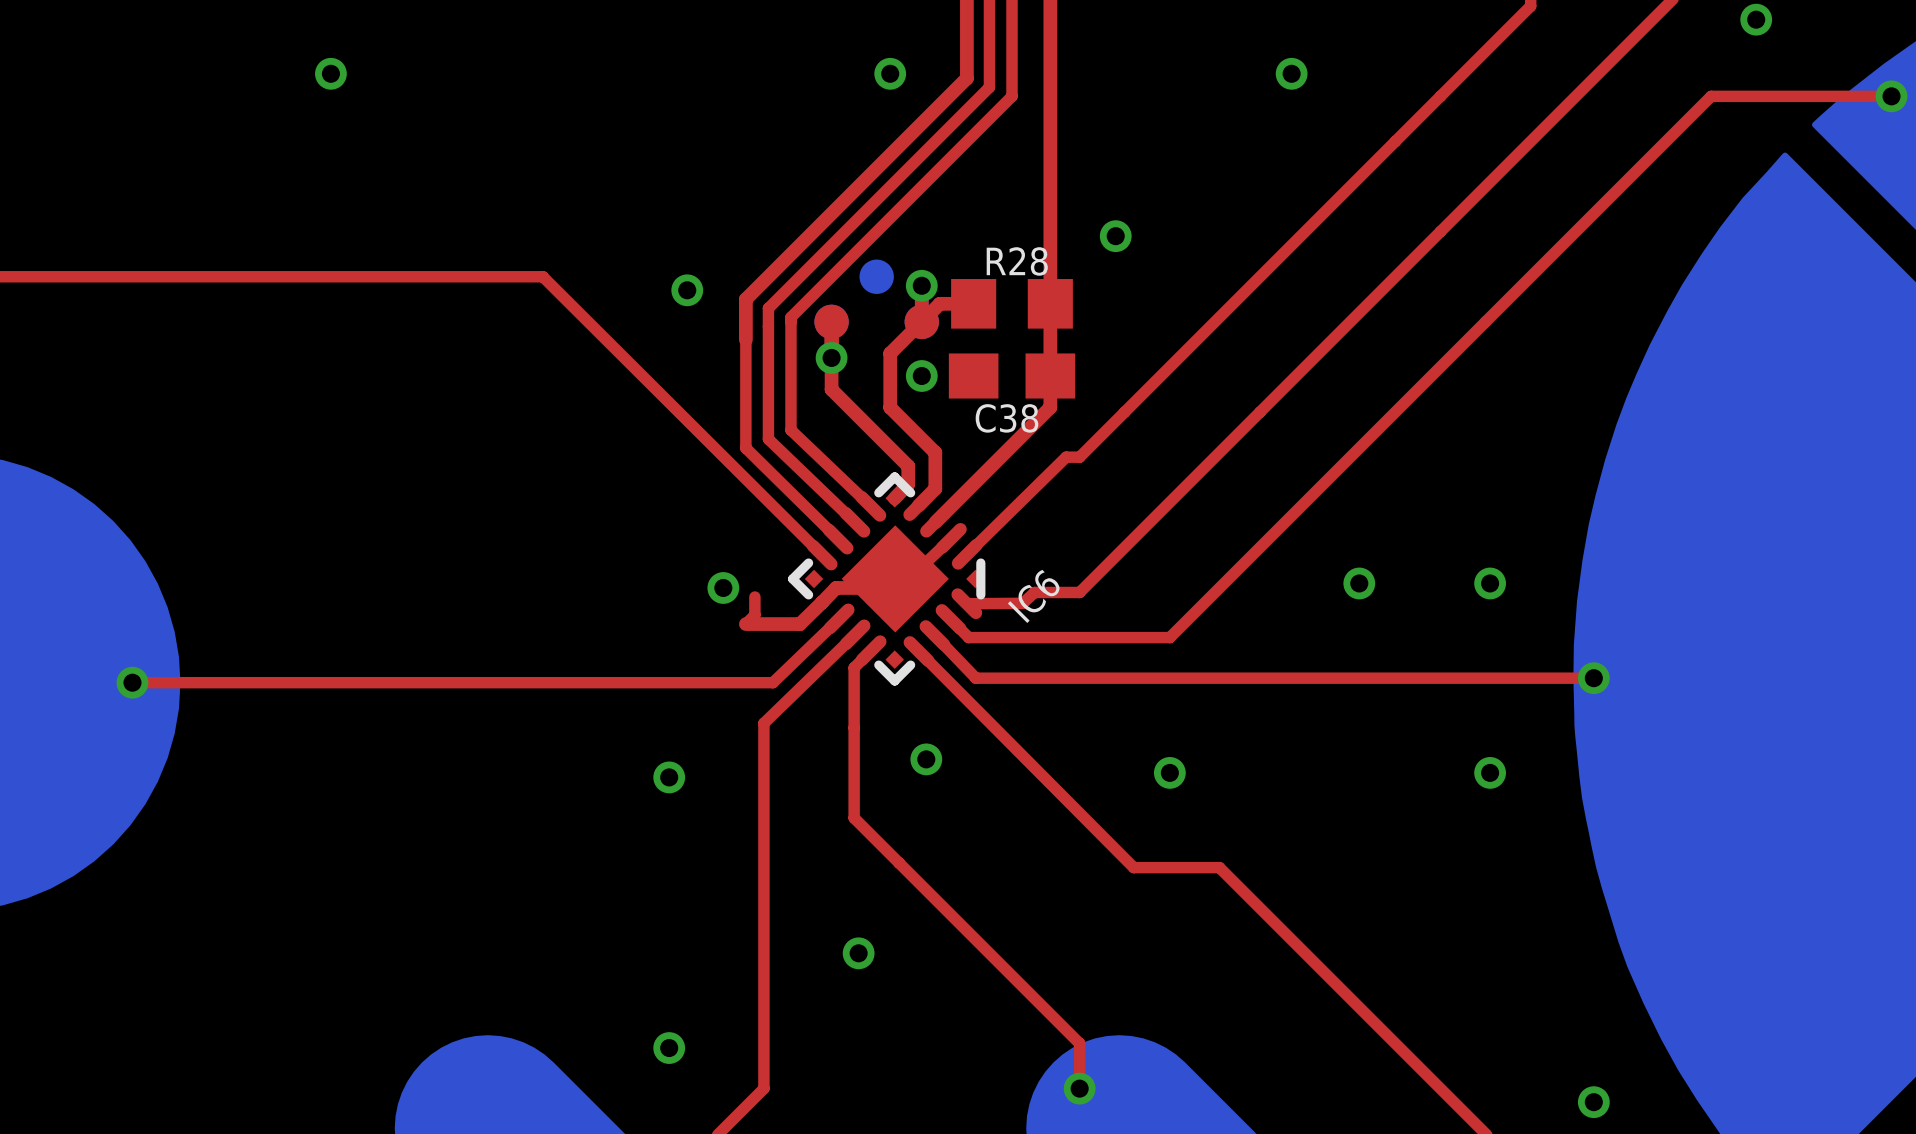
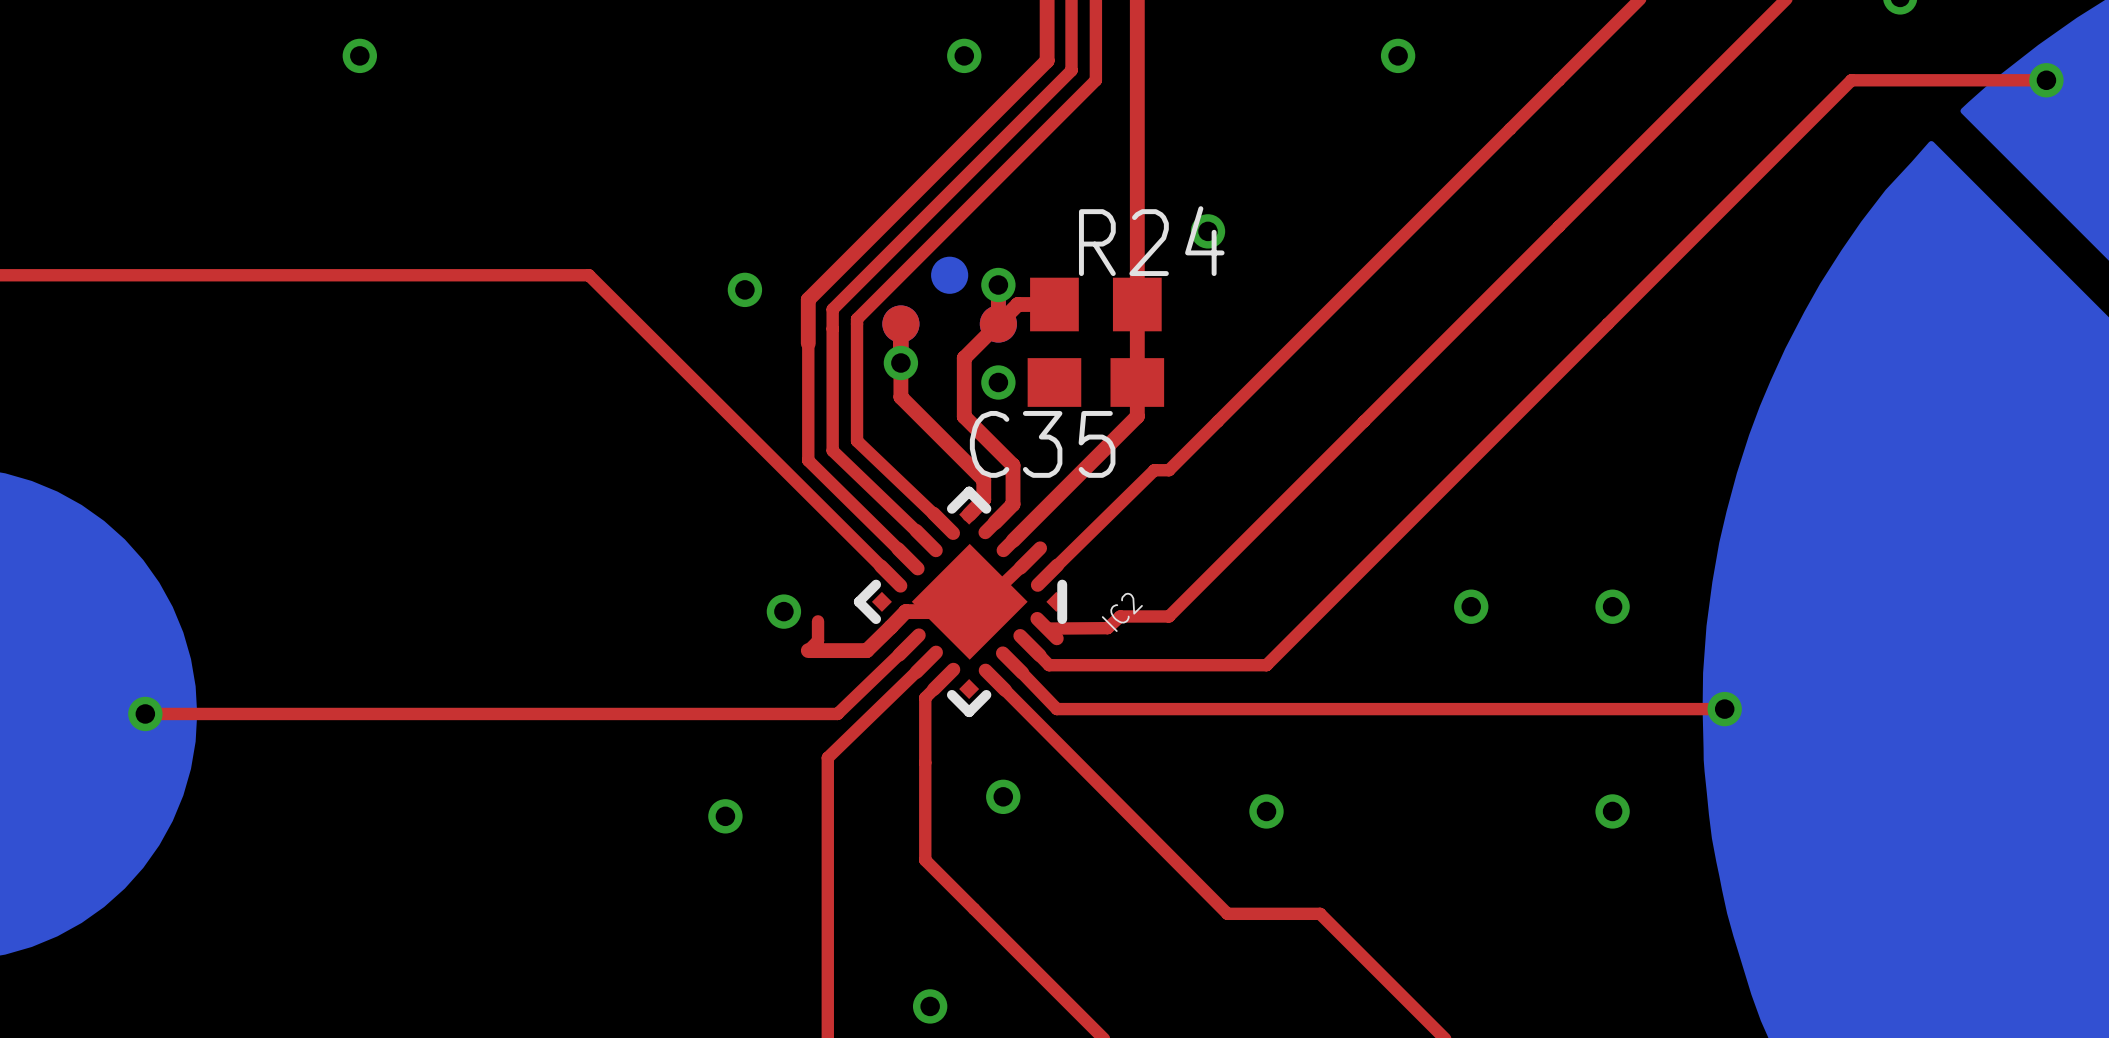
R28 name: R28 (1017, 261) -> R24 (1151, 241)
C38 name: C38 (1006, 418) -> C35 (1042, 444)
IC6 name: IC6 (1033, 596) -> IC2 (1122, 612)

